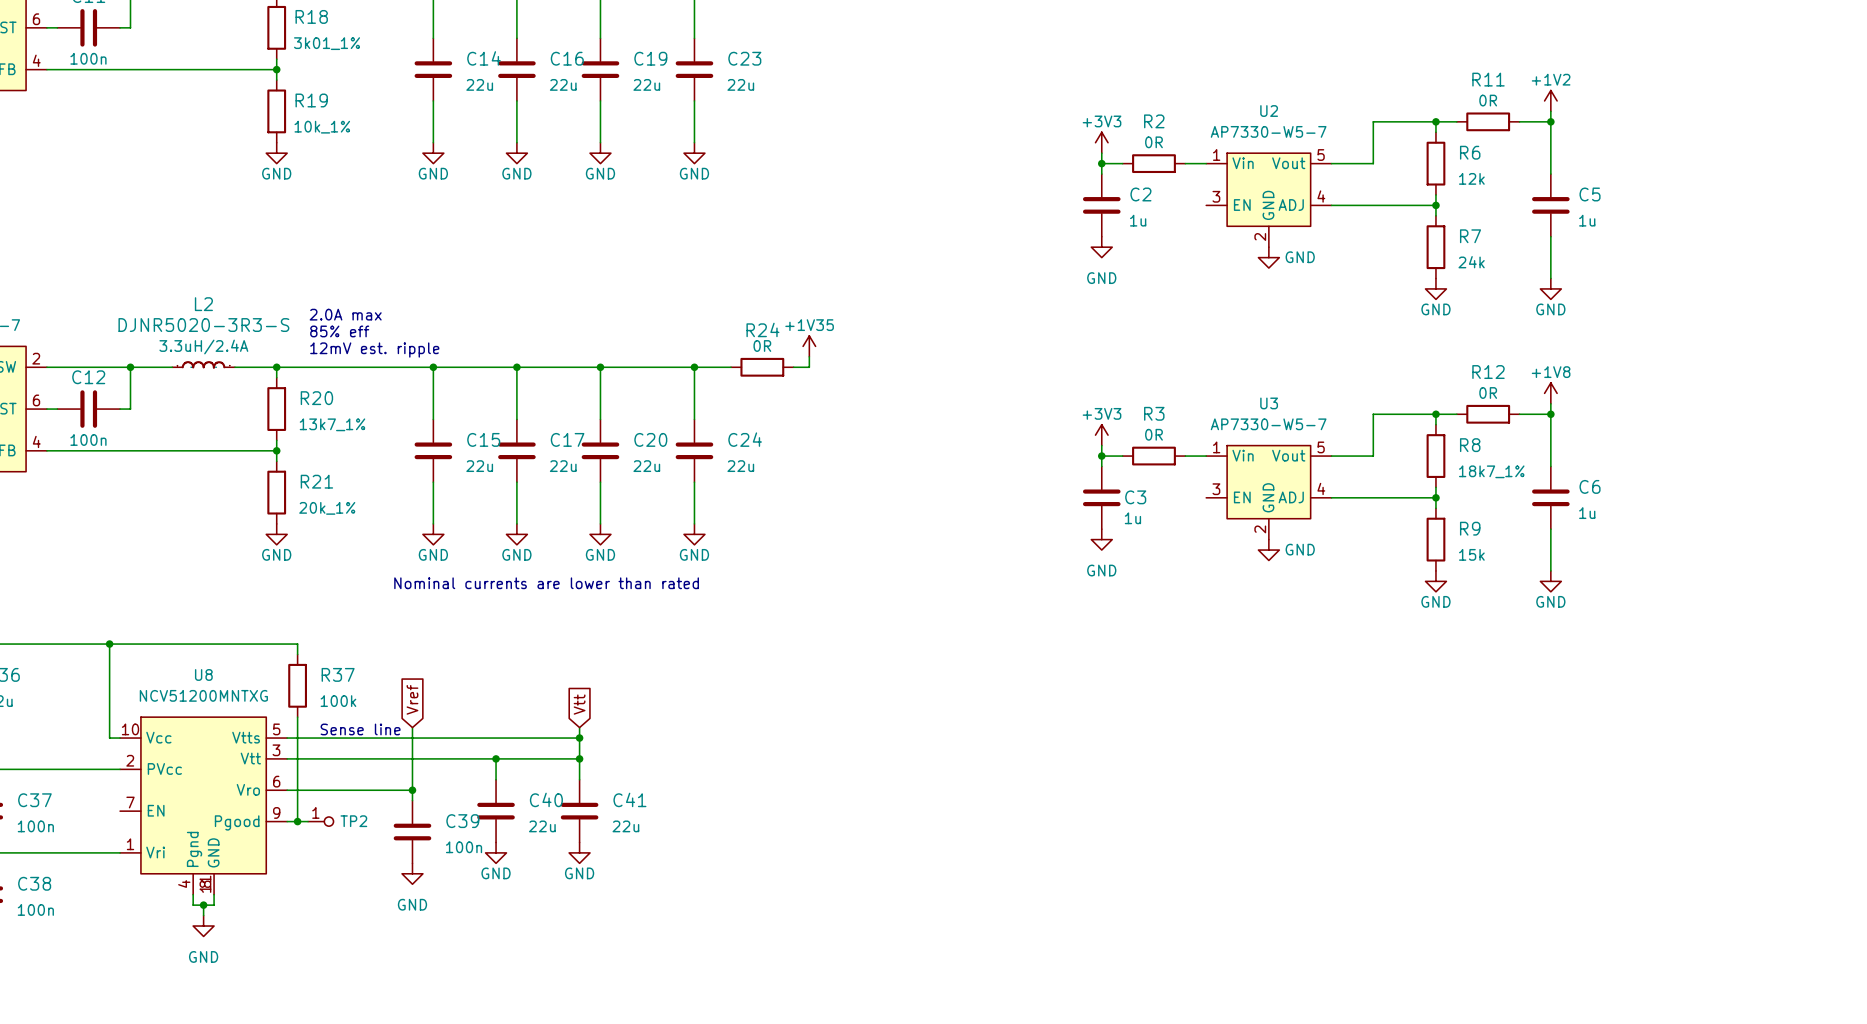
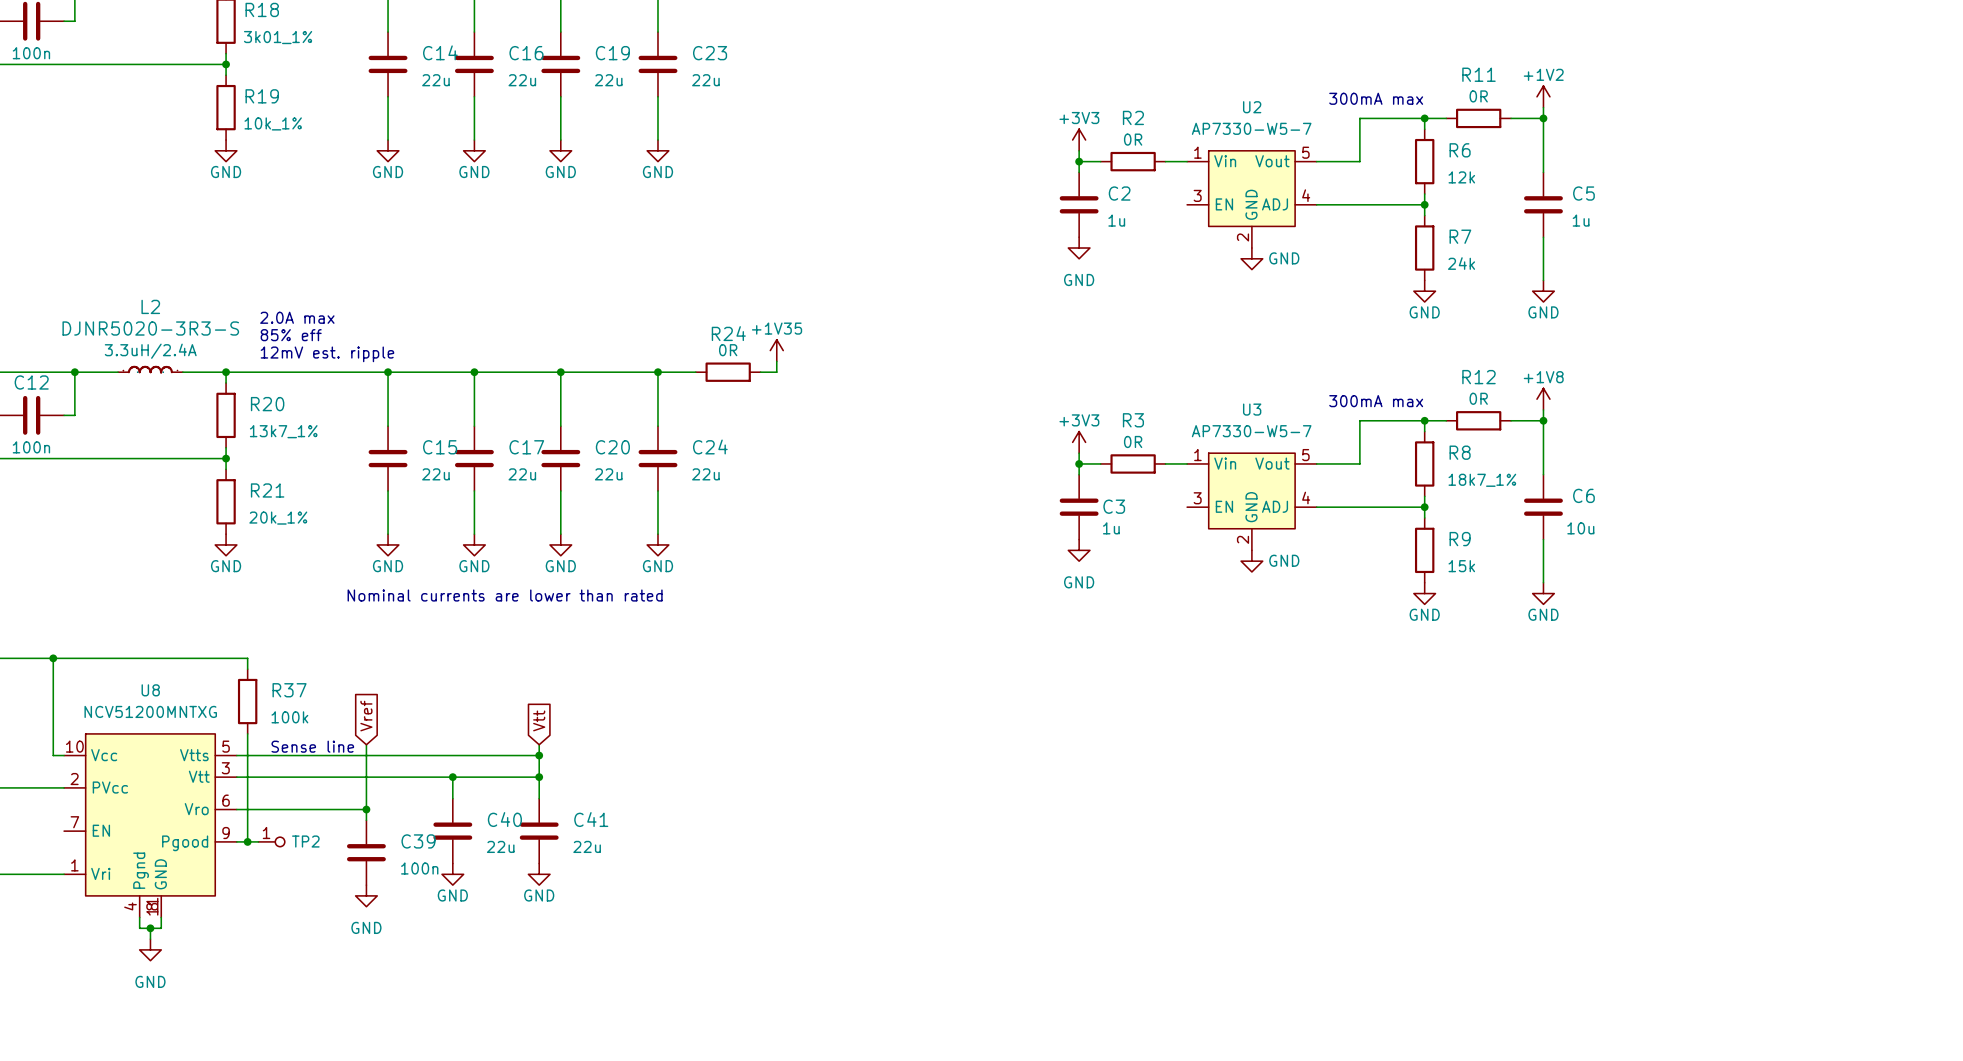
text: none -> 300mA max (1376, 98)
text: none -> 300mA max (1376, 401)
C6 text: 1u (1587, 513) -> 10u (1580, 528)

